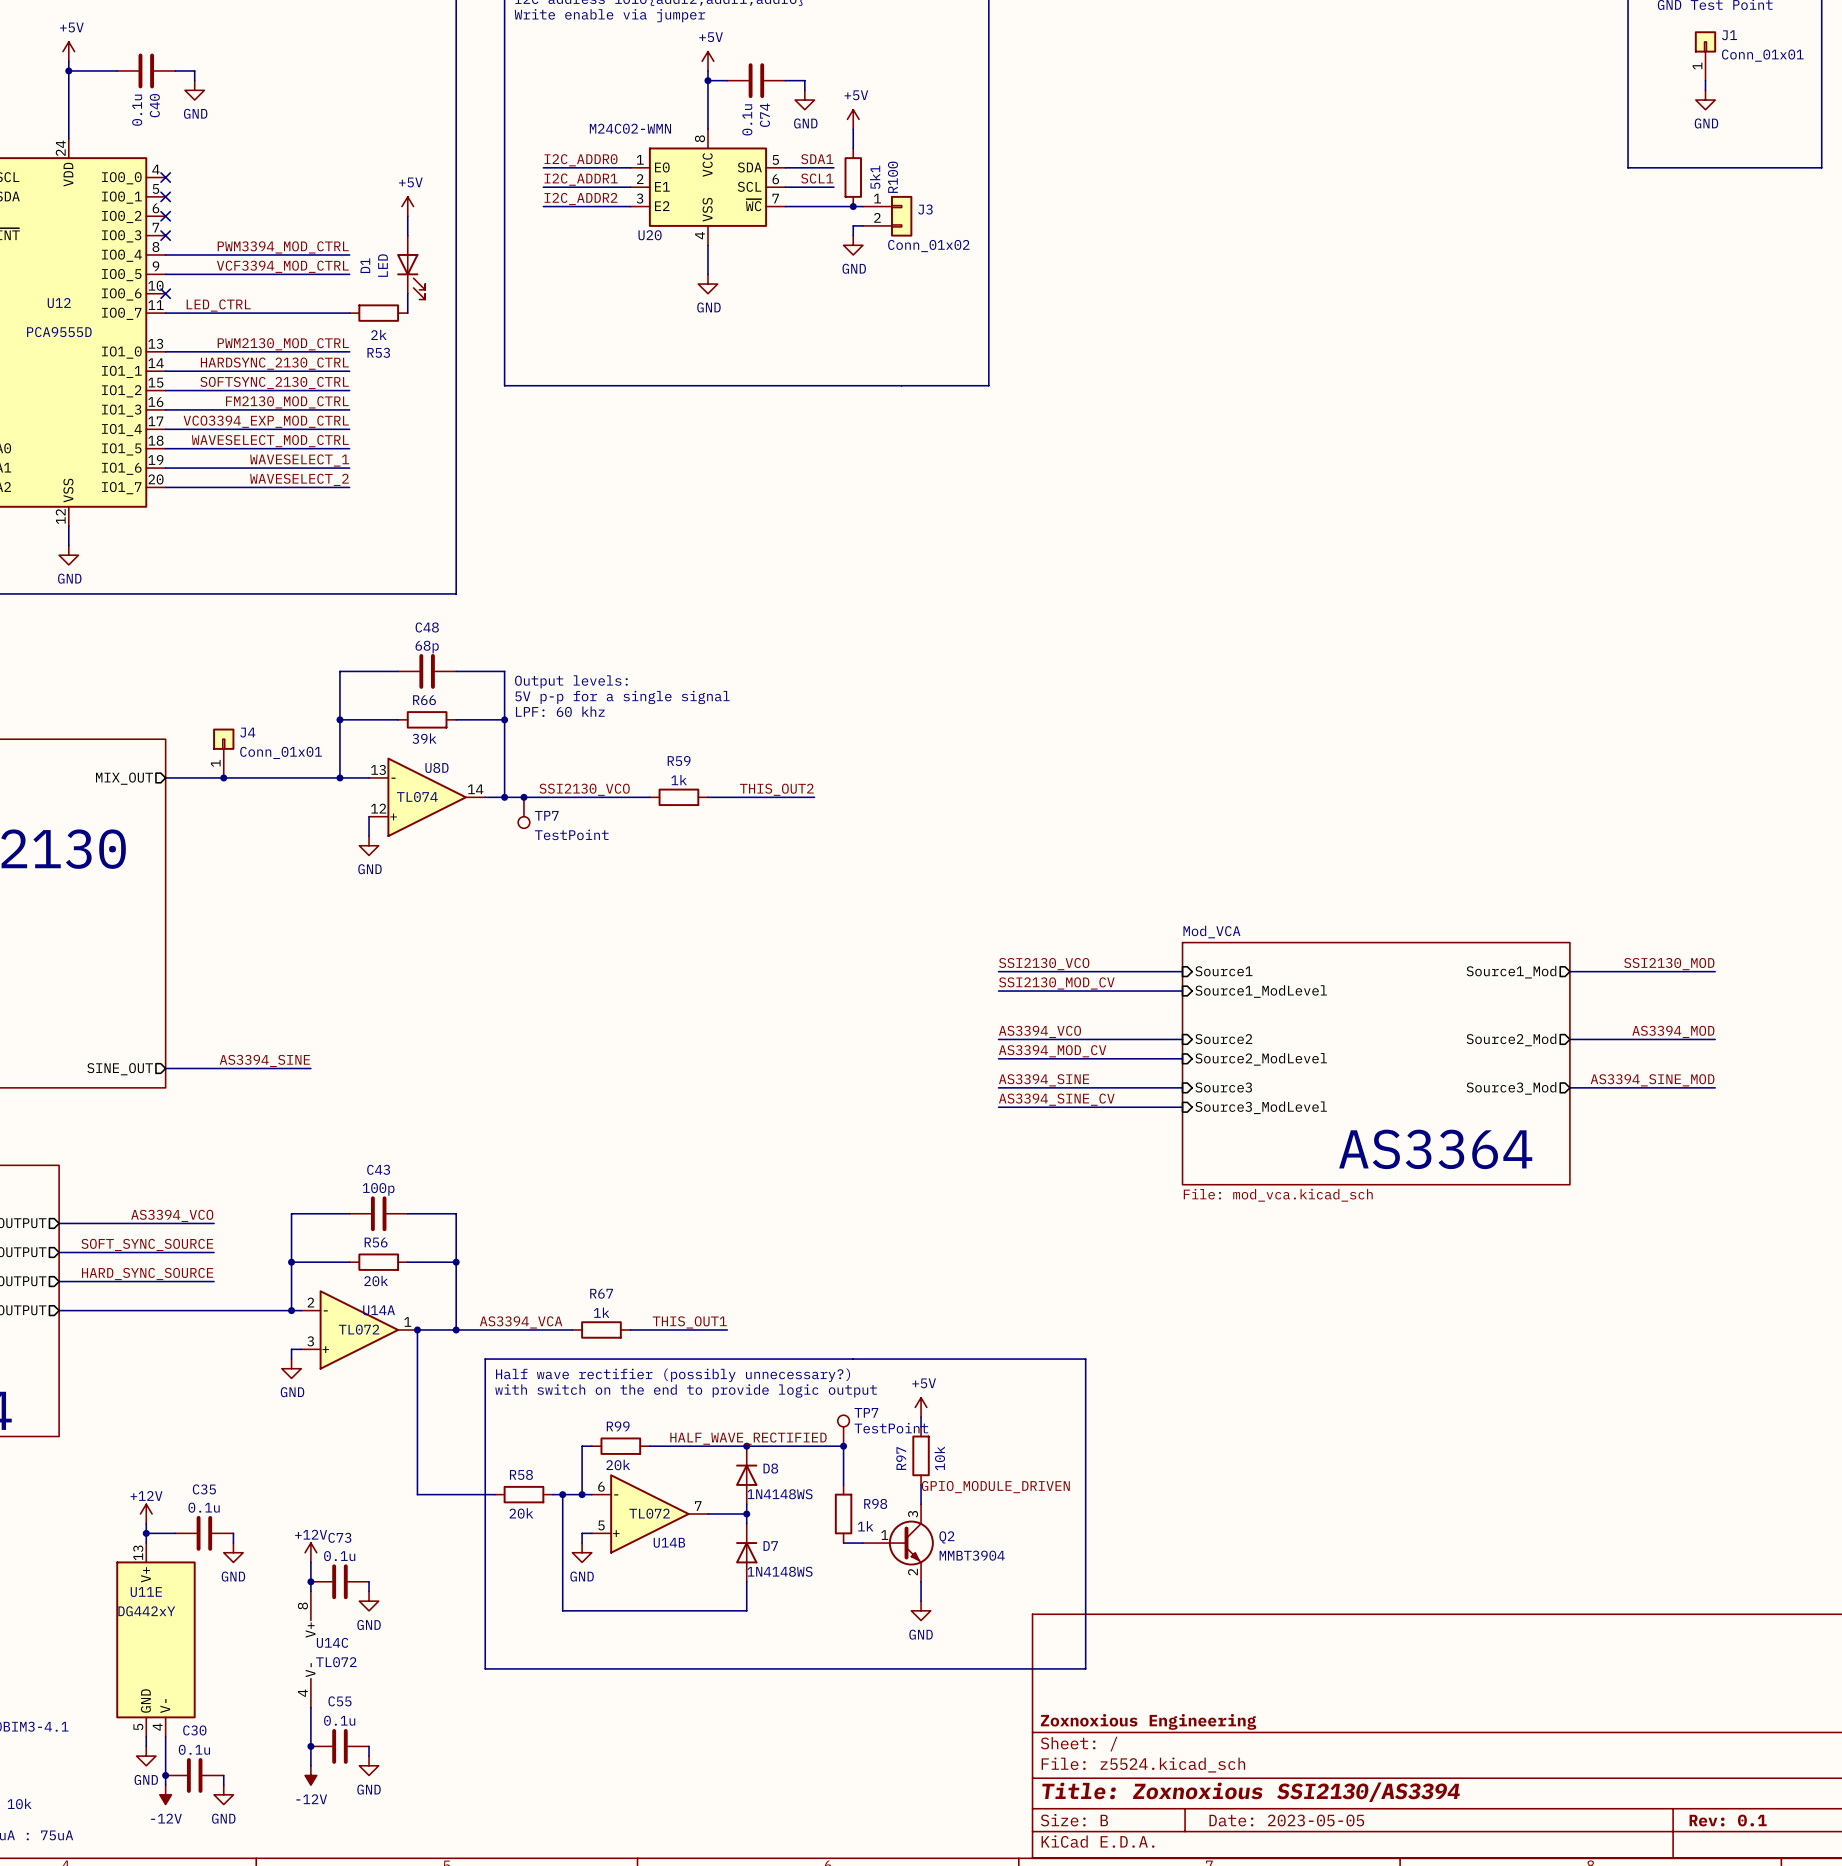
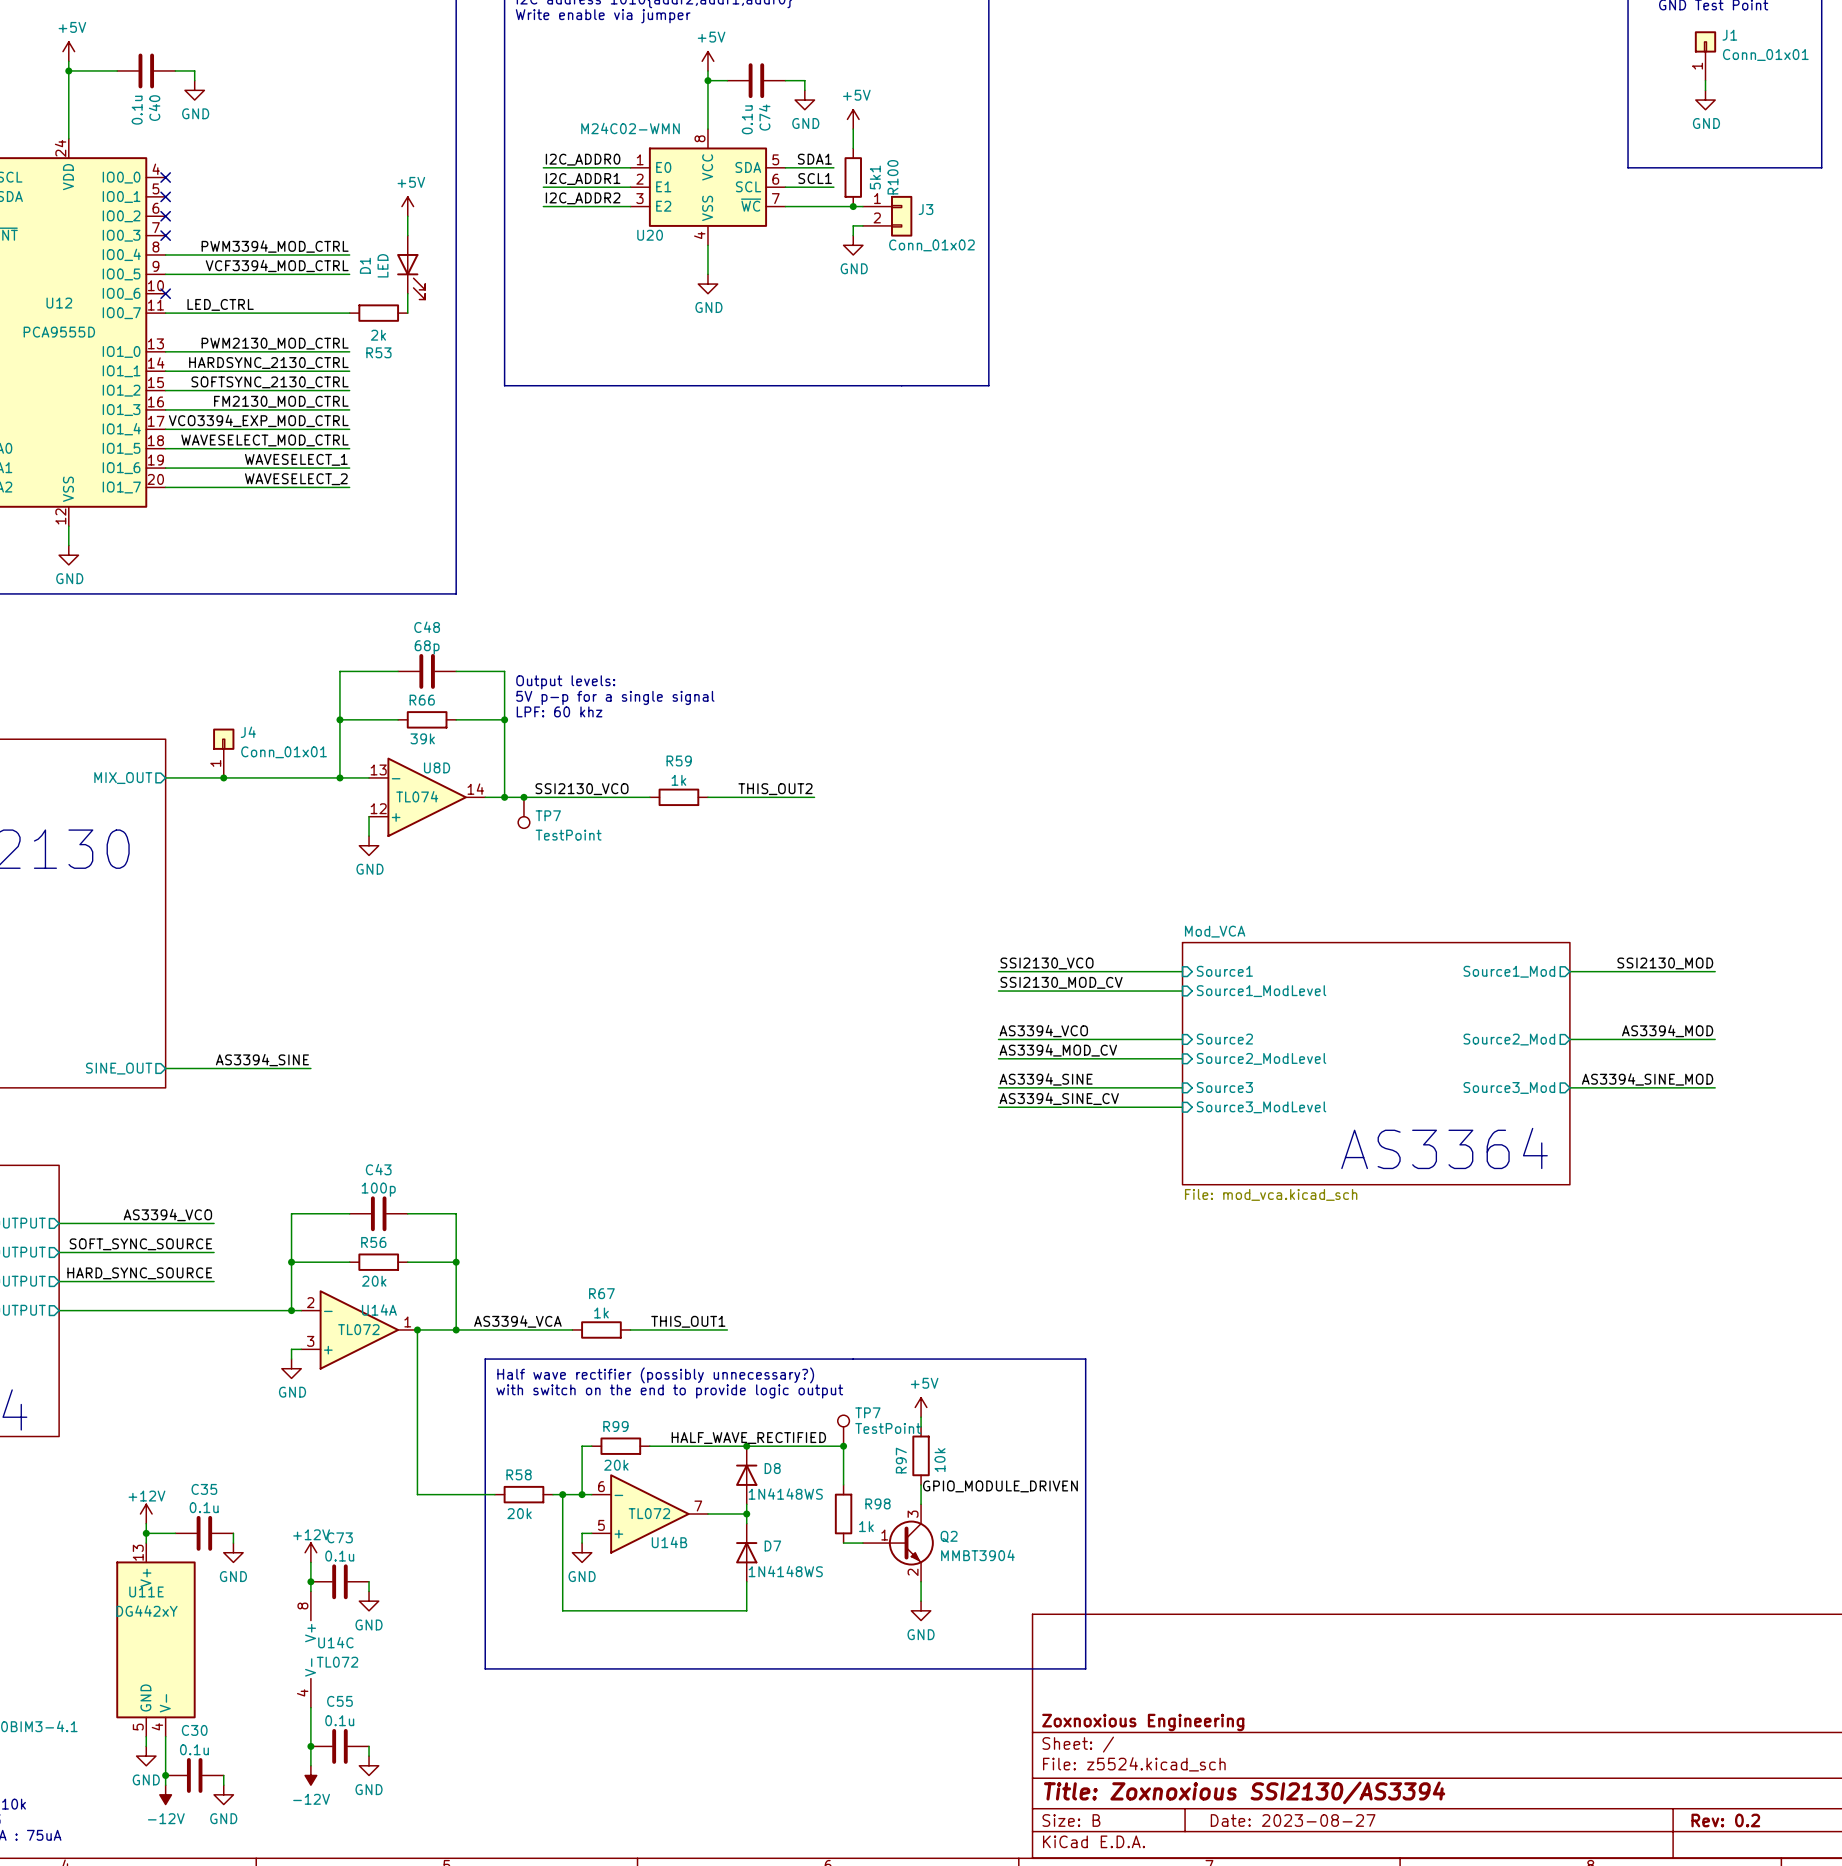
title block: Date: 2023-05-05 (1286, 1820) -> Date: 2023-08-27 (1293, 1820)
title block: Rev: 0.1 (1728, 1820) -> Rev: 0.2 (1725, 1820)

